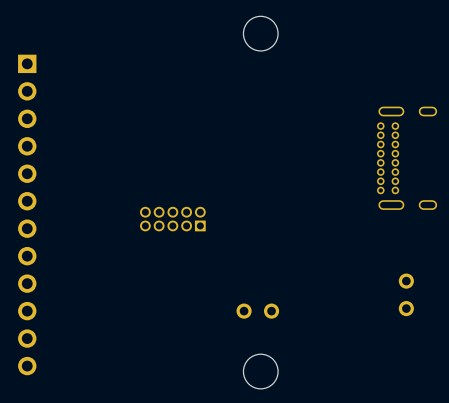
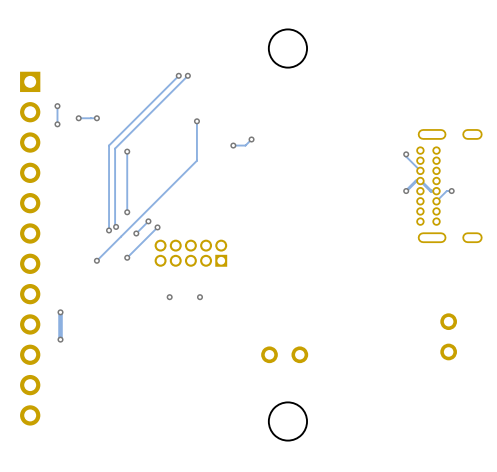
track: none -> (178, 75) (109, 145) (109, 230)
via: none -> (178, 75)
track: none -> (187, 75) (115, 148) (116, 226)
via: none -> (187, 75)
track: none -> (57, 106) (57, 124)
via: none -> (57, 106)
via: none -> (78, 118)
track: none -> (96, 118) (78, 118)
via: none -> (96, 118)
track: none -> (196, 121) (196, 160) (96, 260)
via: none -> (196, 121)
via: none -> (57, 124)
track: none -> (251, 139) (245, 145) (233, 145)
via: none -> (251, 139)
via: none -> (233, 145)
track: none -> (127, 151) (127, 212)
via: none -> (127, 151)
track: none -> (406, 154) (406, 156) (420, 170)
via: none -> (406, 154)
track: none -> (406, 191) (416, 181) (420, 181) (431, 191) (436, 191)
via: none -> (406, 191)
track: none -> (451, 191) (446, 191) (436, 201)
via: none -> (451, 191)
via: none -> (127, 212)
track: none -> (148, 221) (136, 233)
via: none -> (148, 221)
via: none -> (116, 226)
track: none -> (157, 227) (127, 257)
via: none -> (157, 227)
via: none -> (109, 230)
via: none -> (136, 233)
via: none -> (127, 257)
via: none -> (96, 260)
via: none -> (169, 297)
via: none -> (200, 297)
track: none -> (60, 312) (60, 339)
via: none -> (60, 312)
via: none -> (60, 339)

